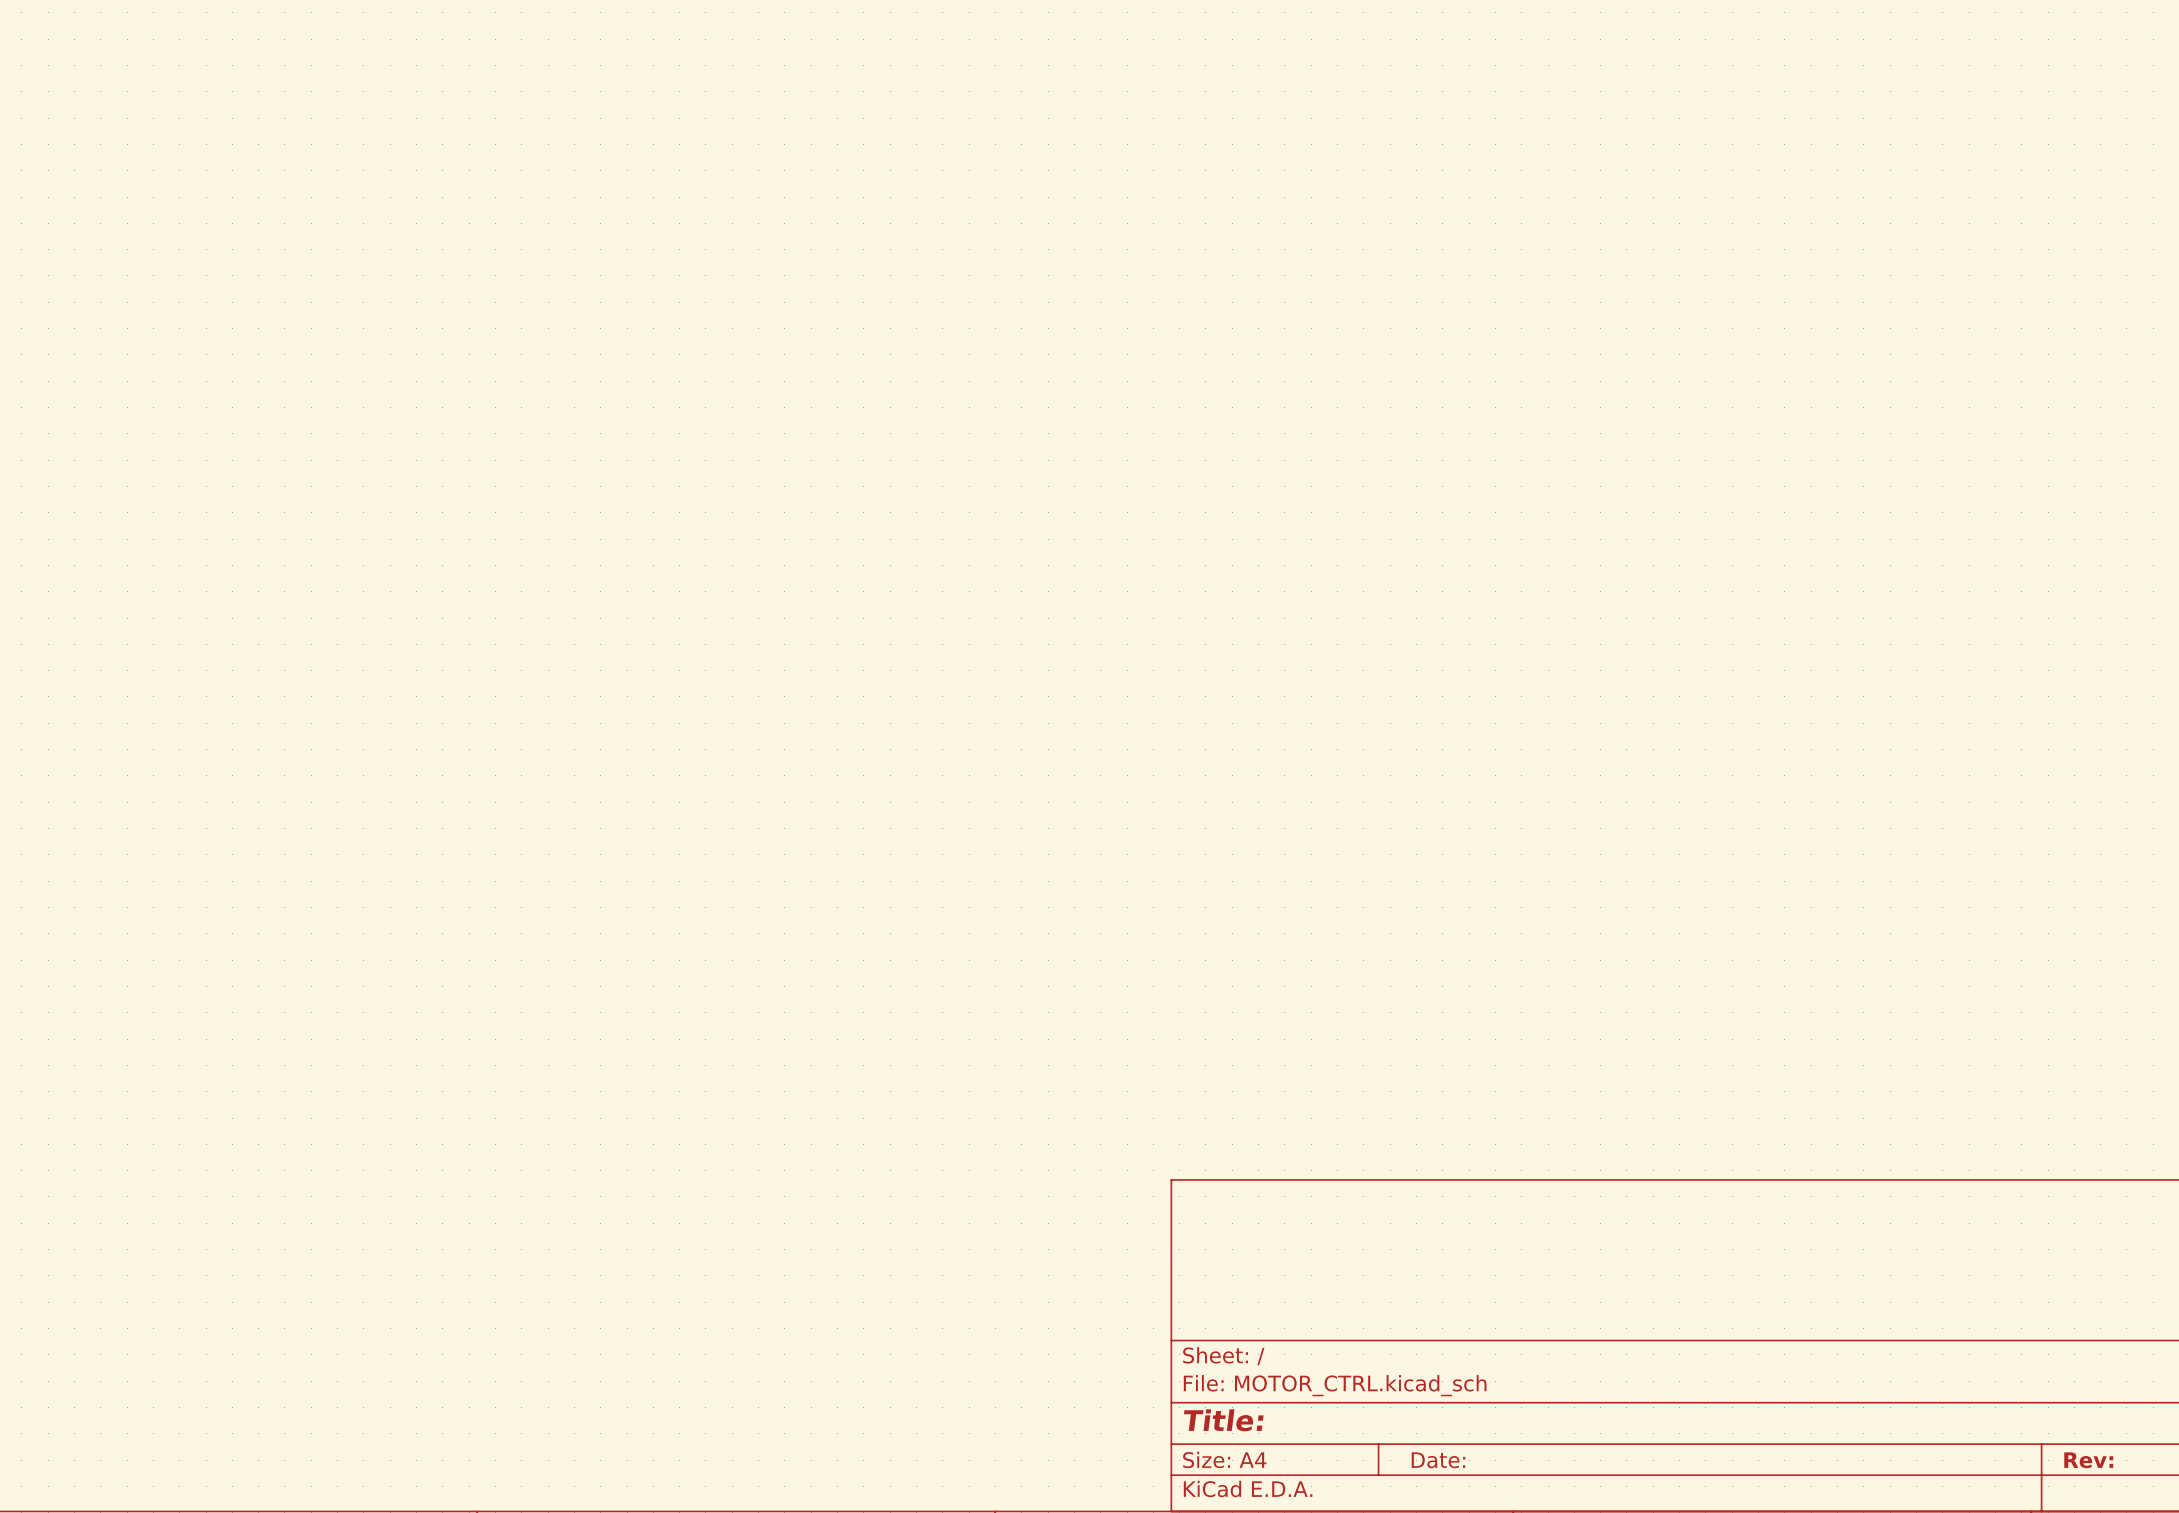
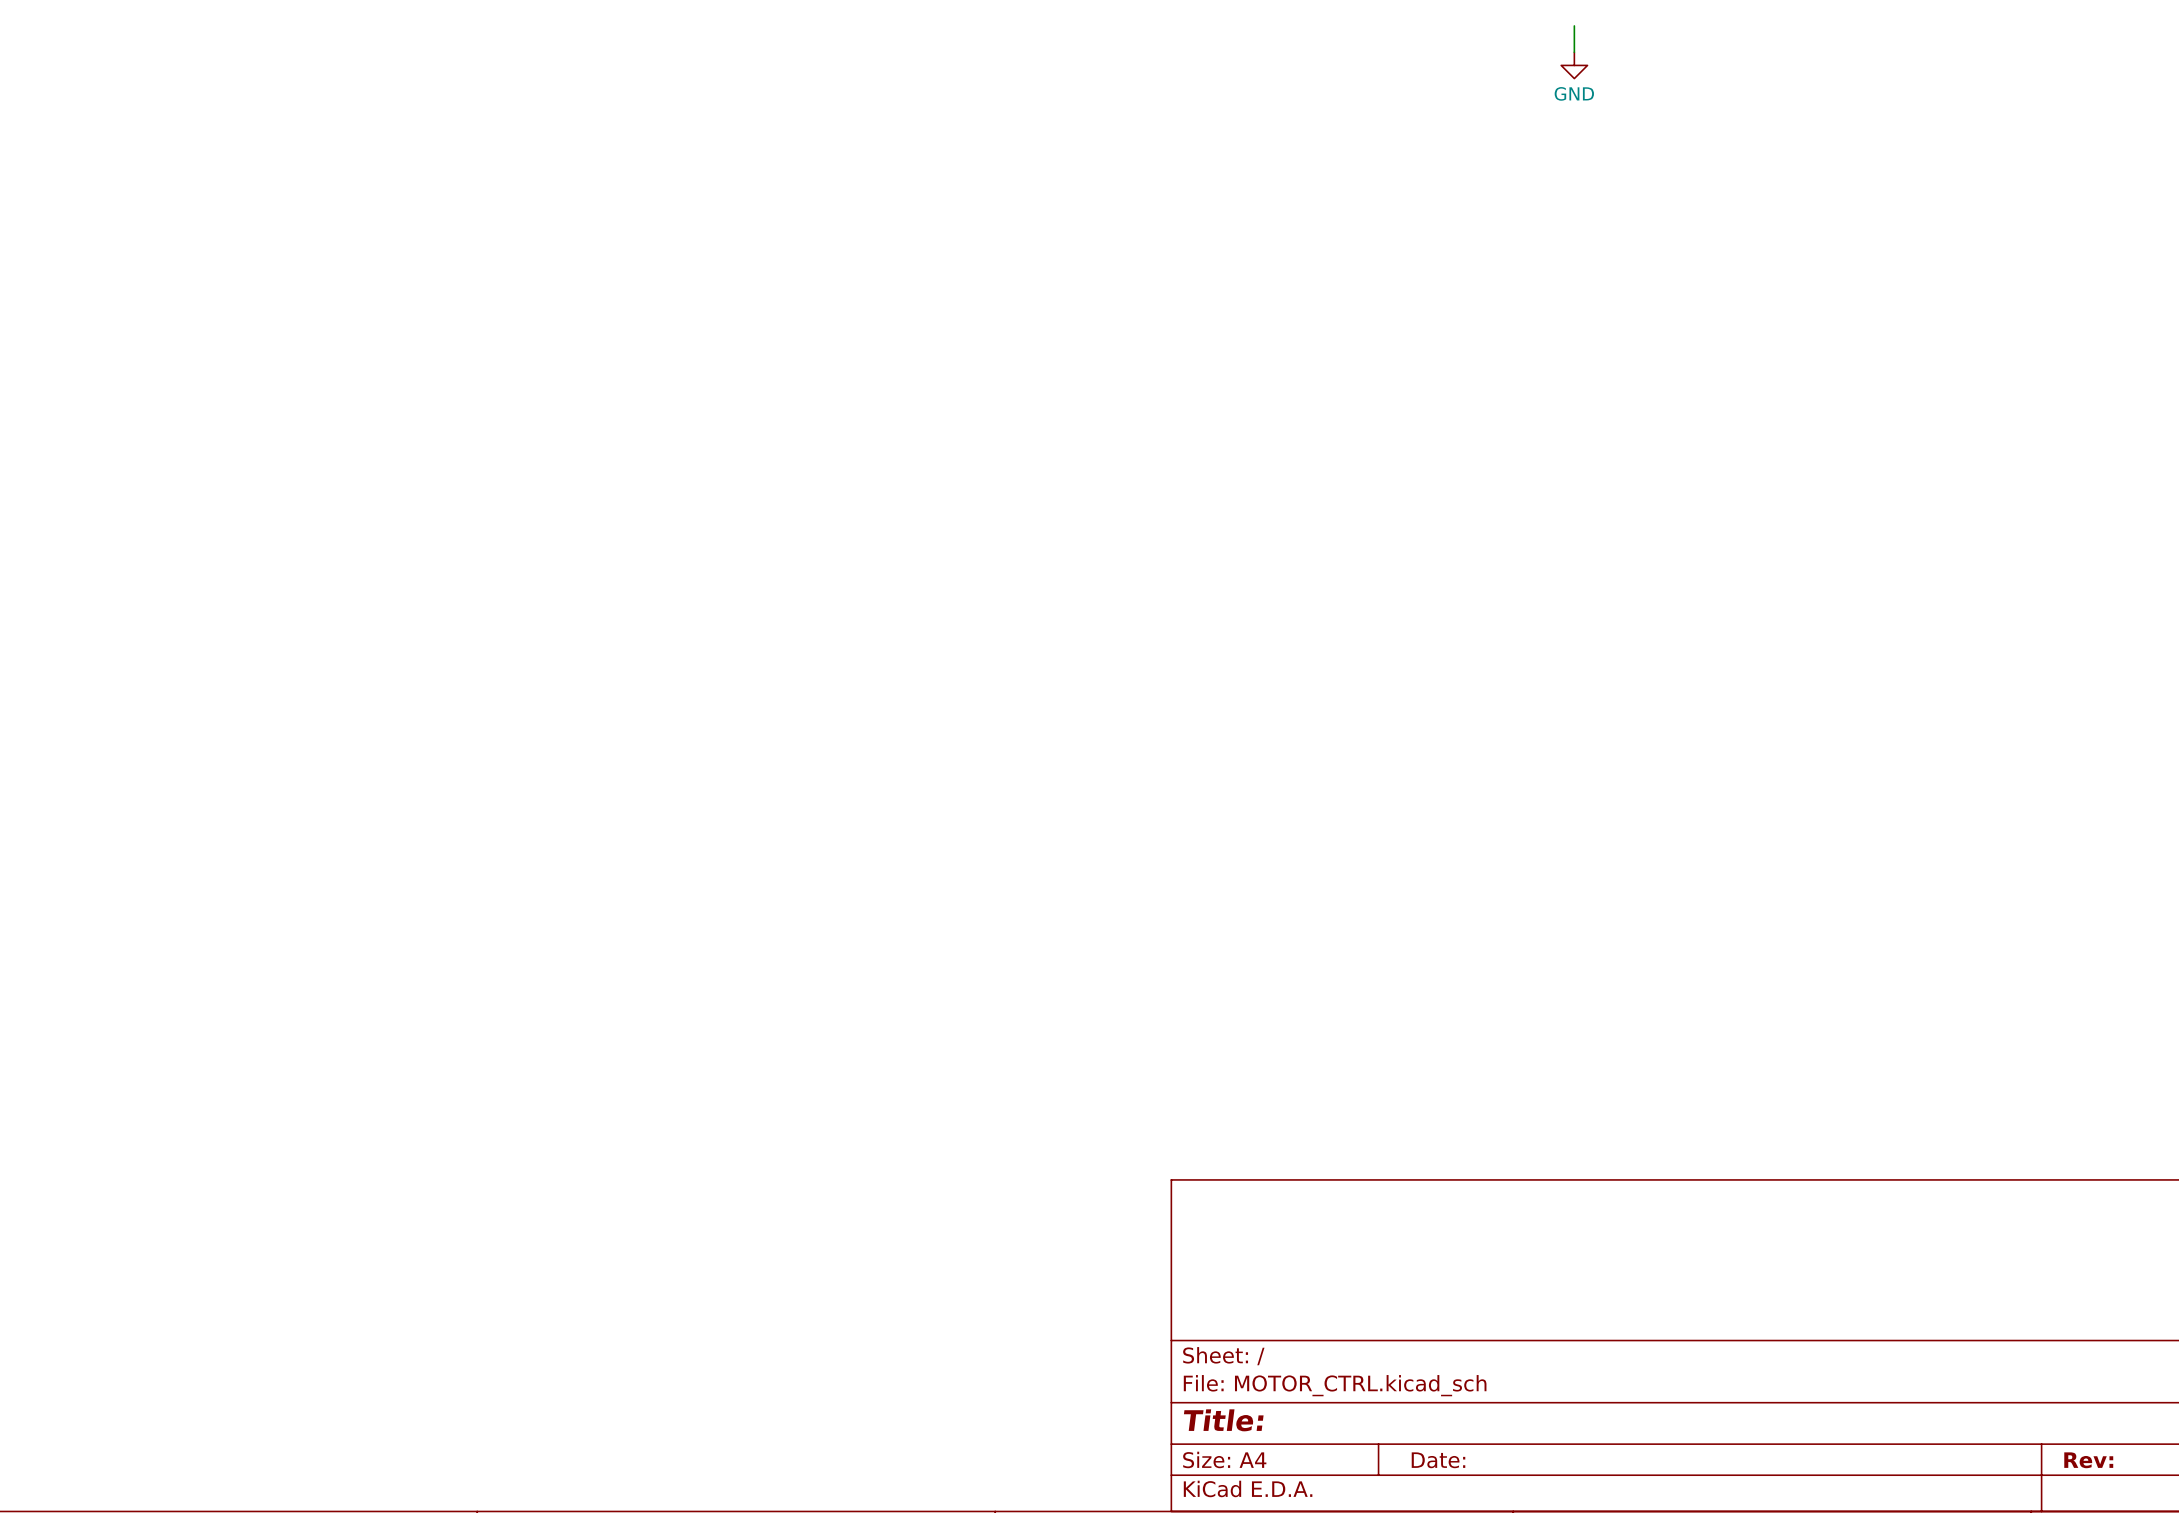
wire: none -> (1574, 25) (1574, 52)
power symbol: none -> GND (1574, 65)

